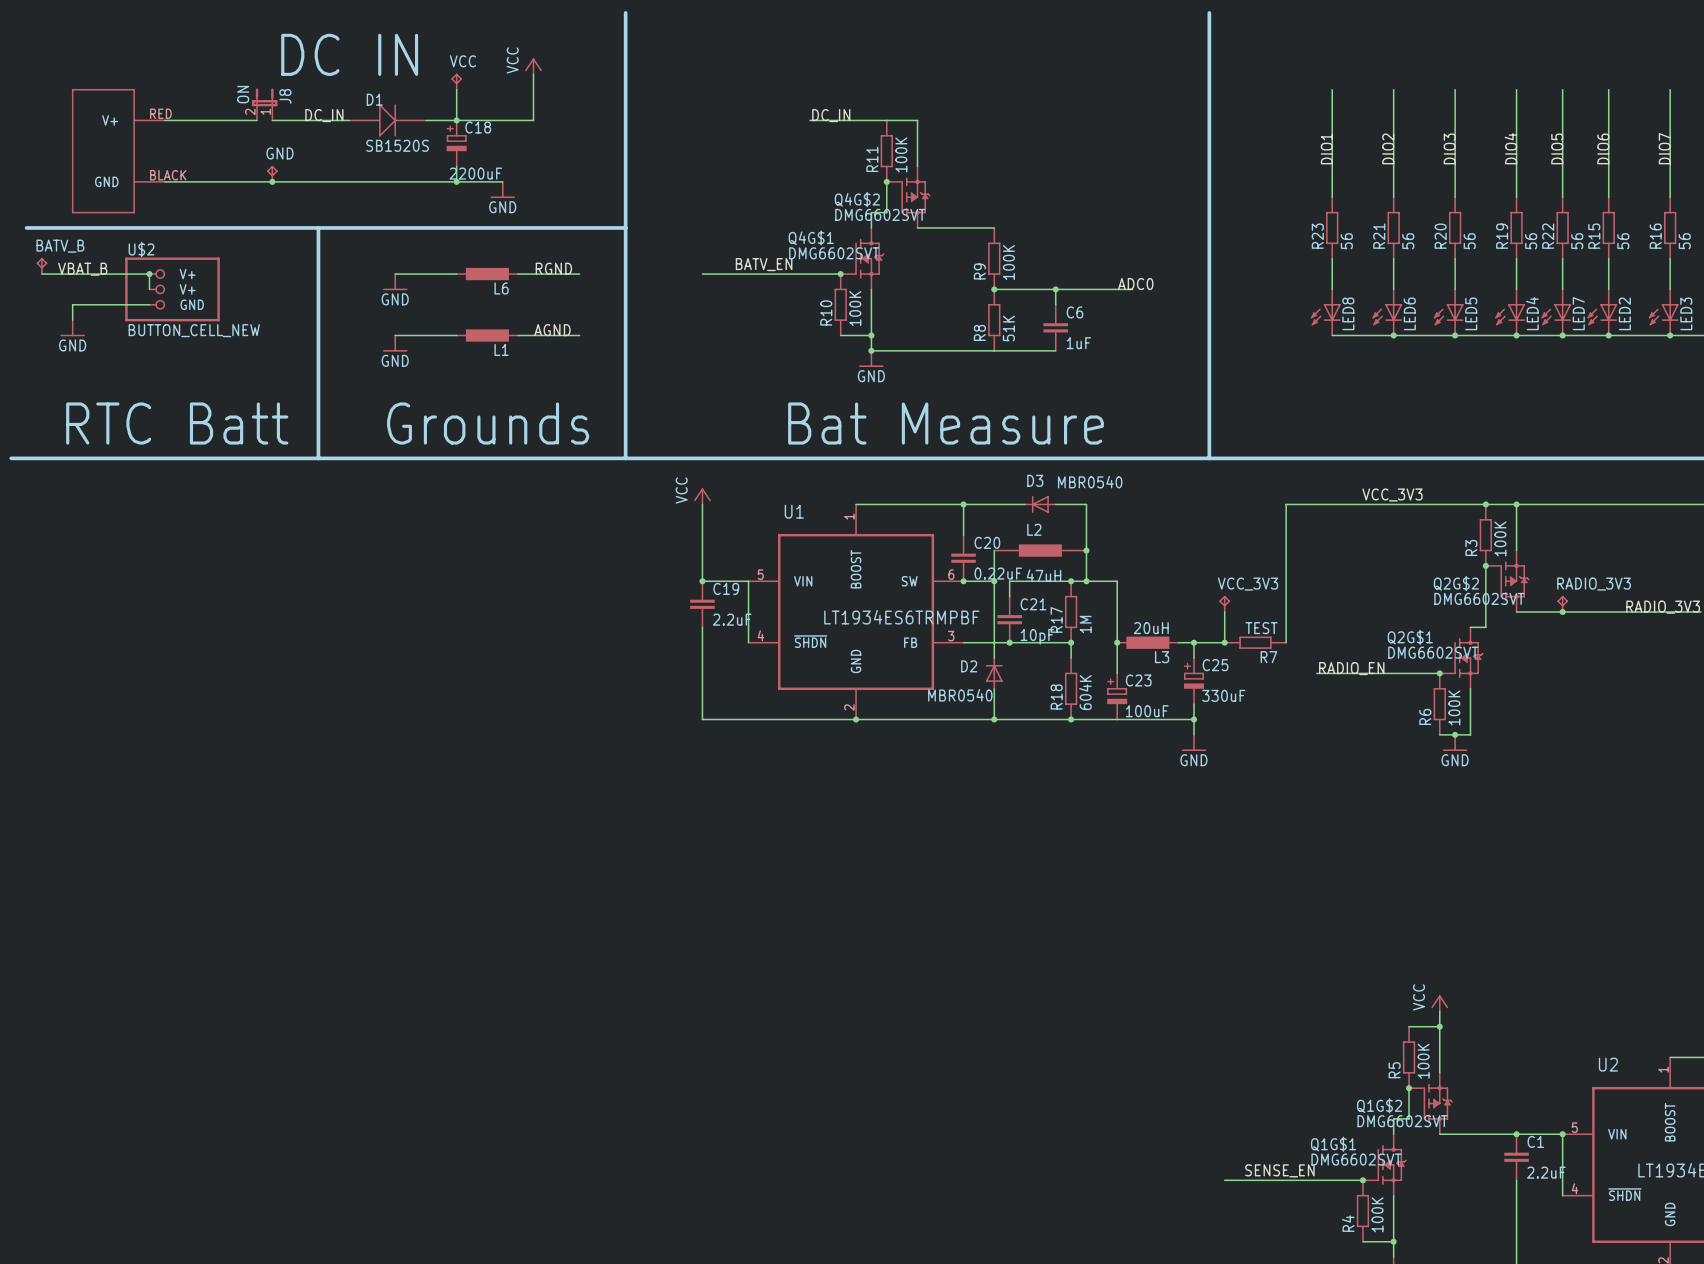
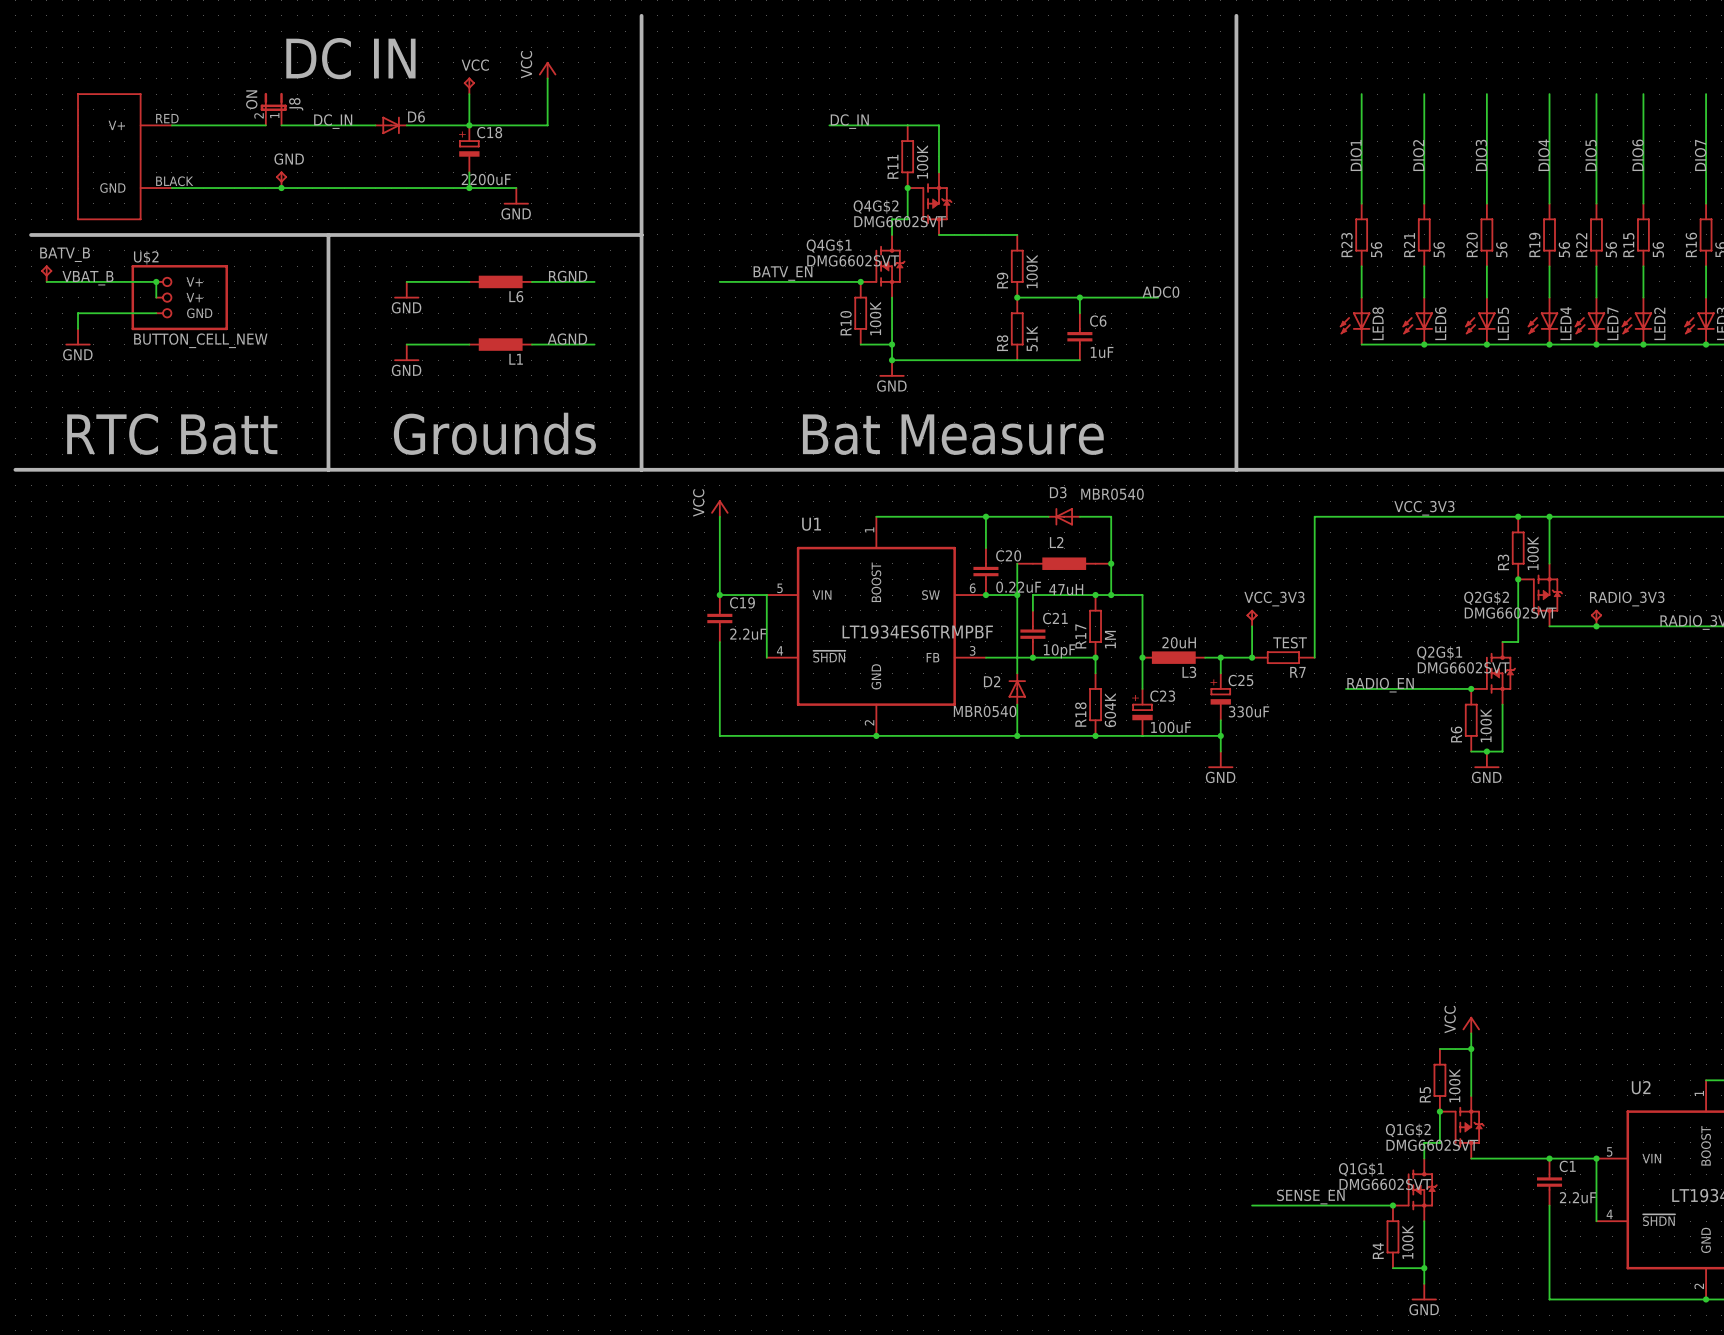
D6: none -> (391, 125)
D1: SB1520S (387, 120) -> none

